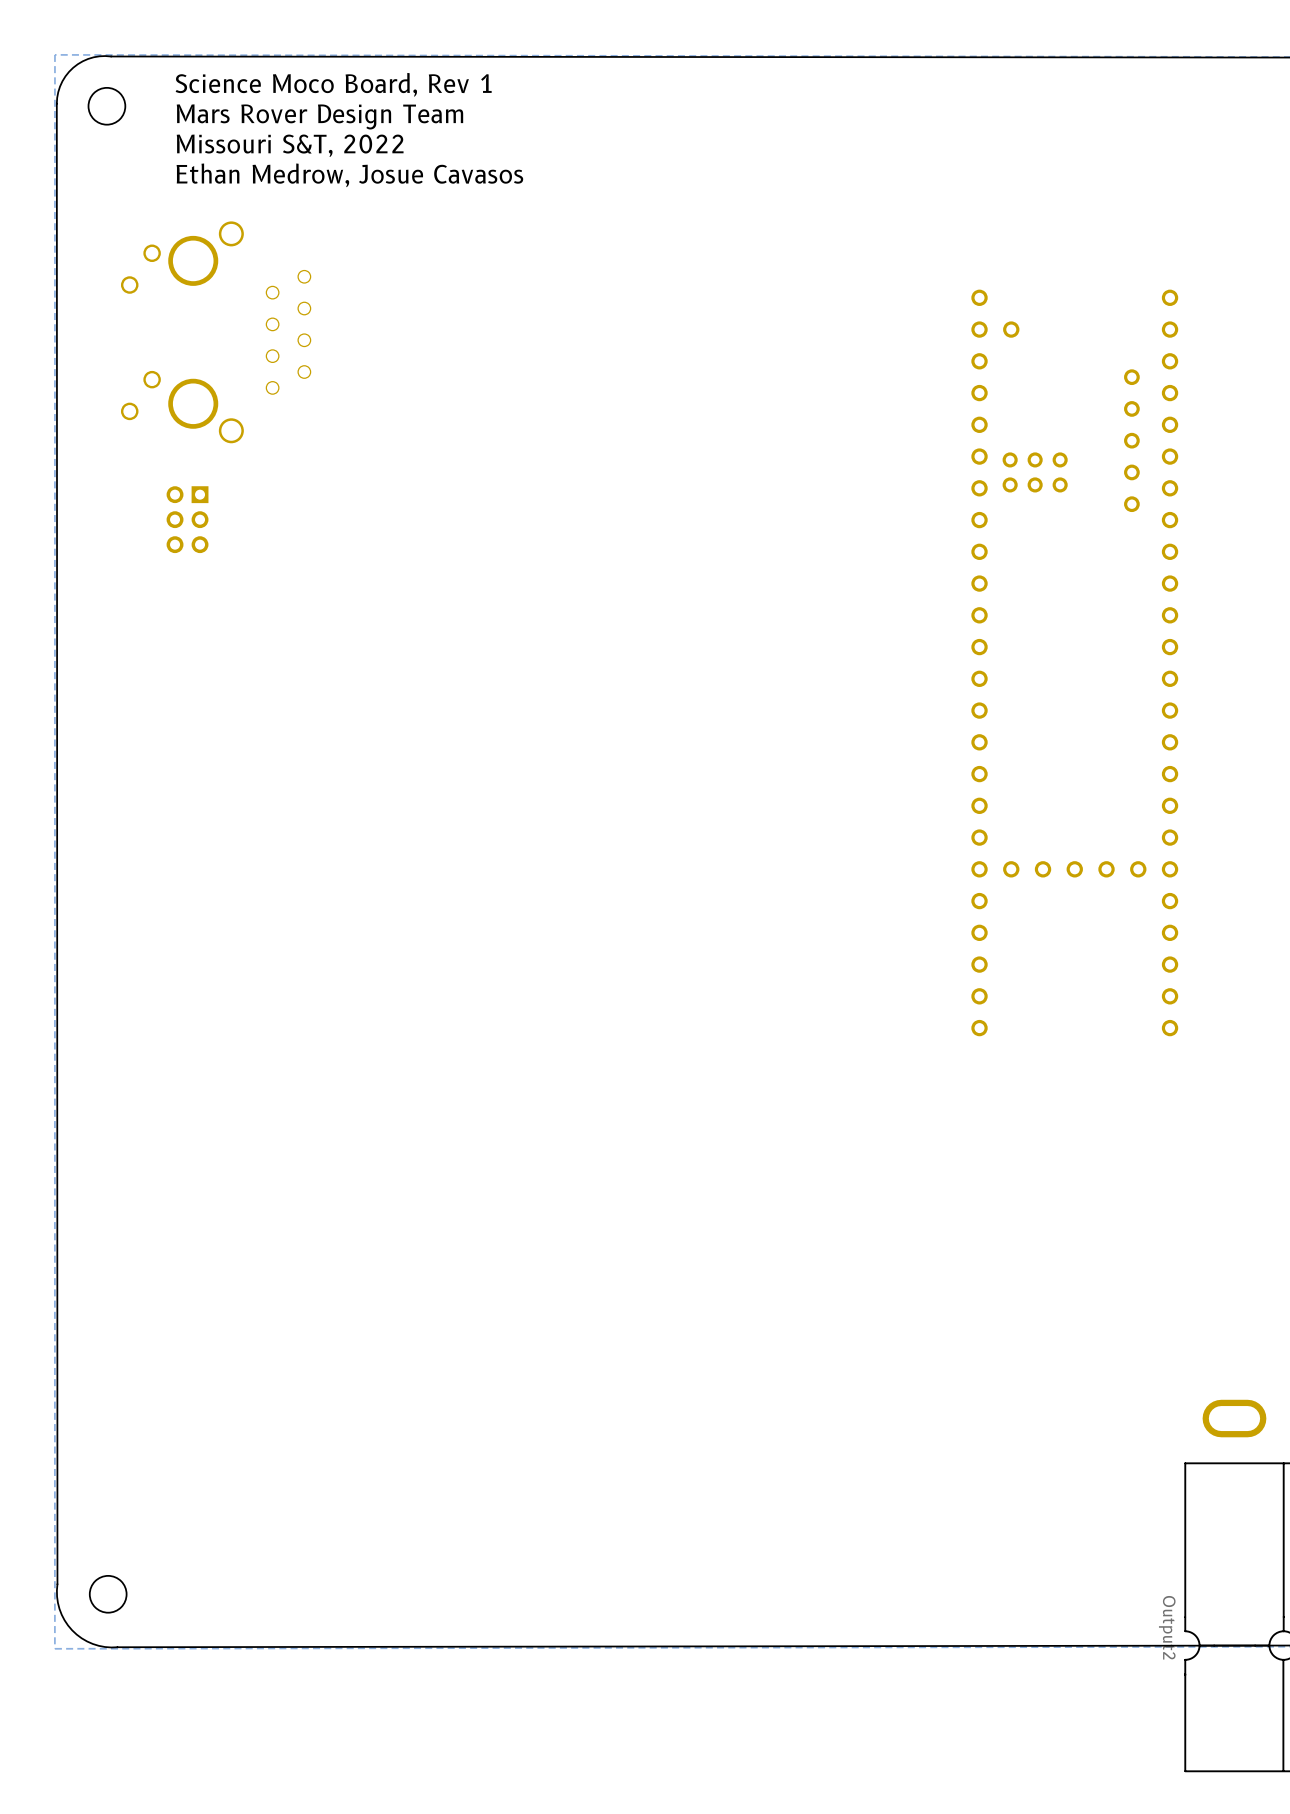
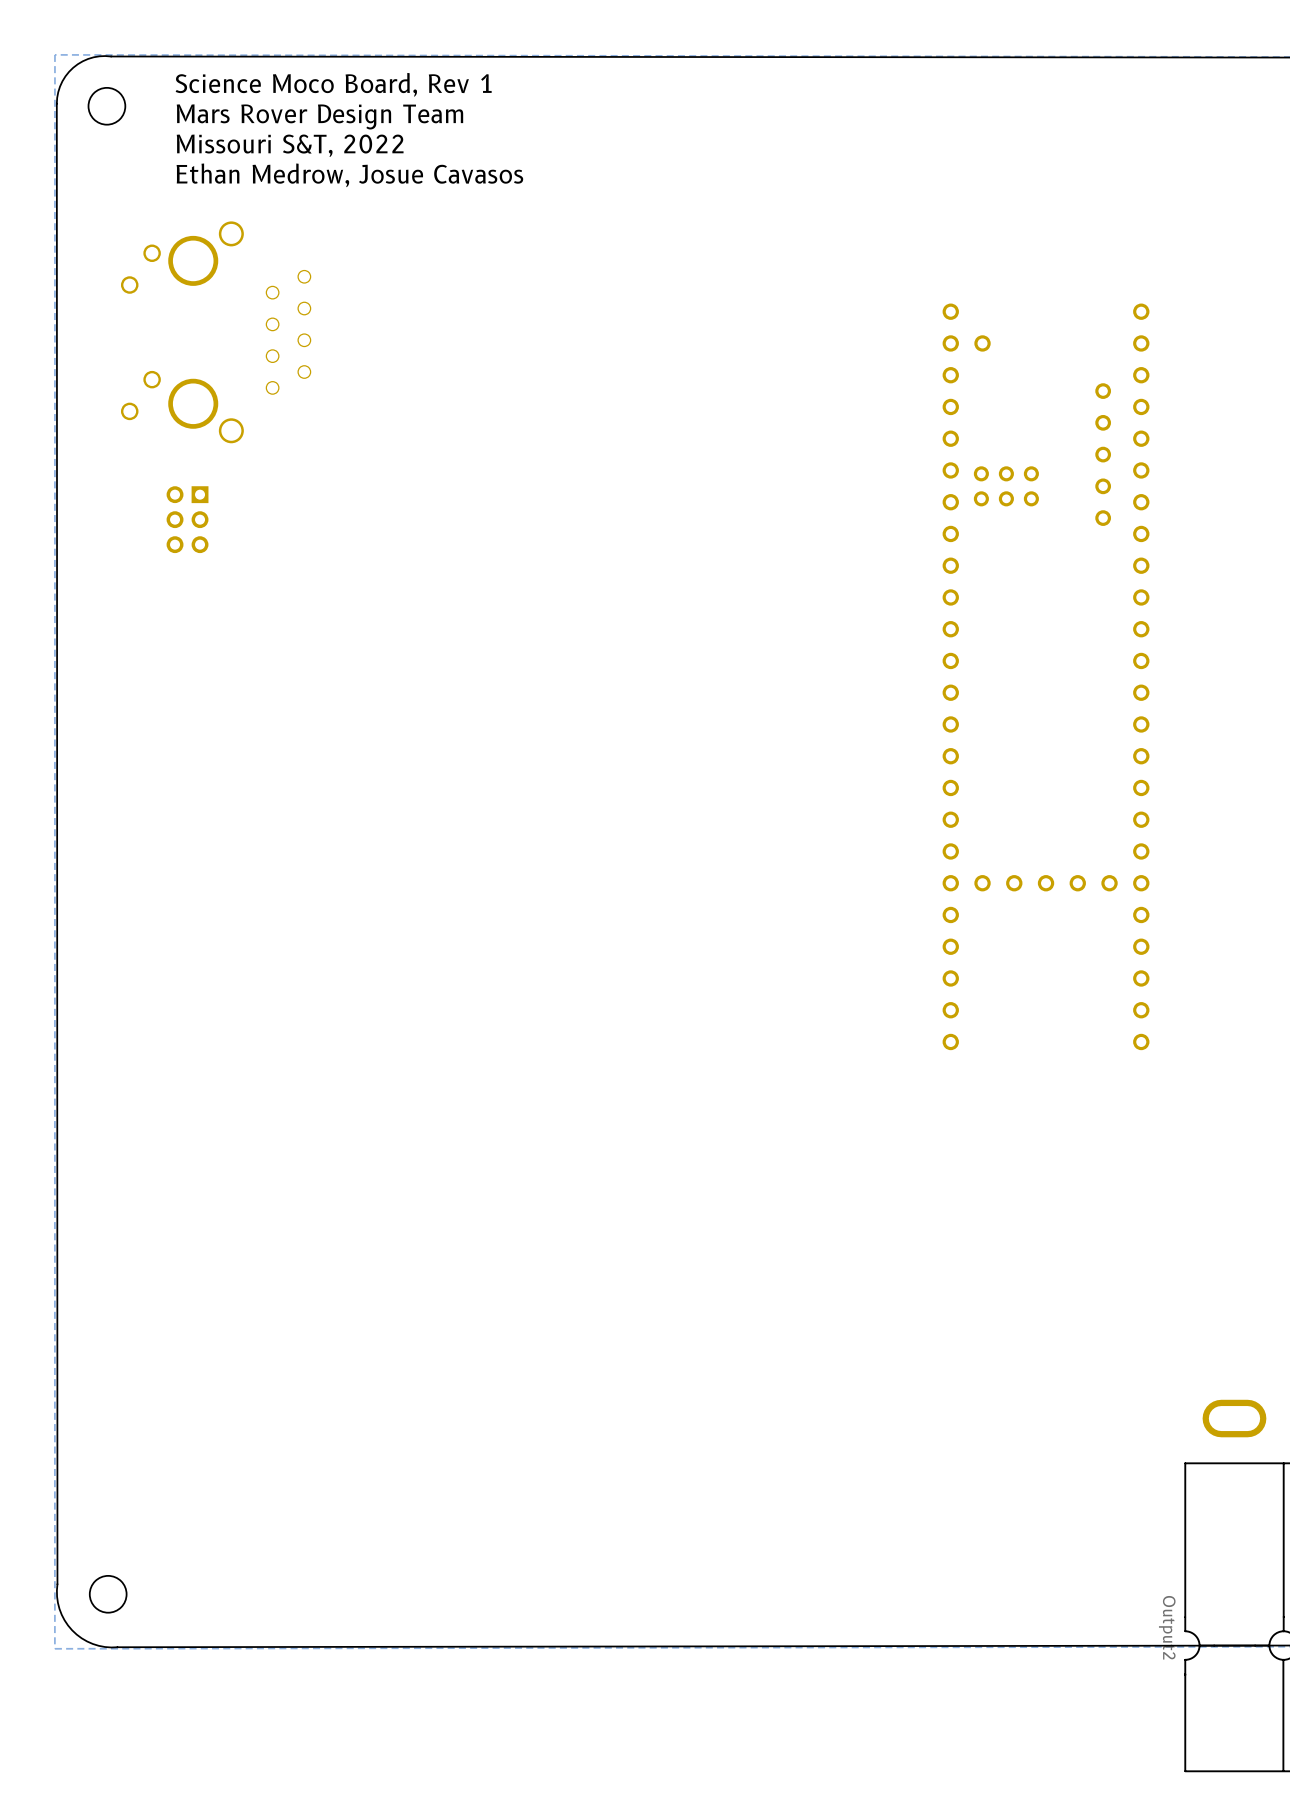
part position: (1074, 662) -> (1046, 676)

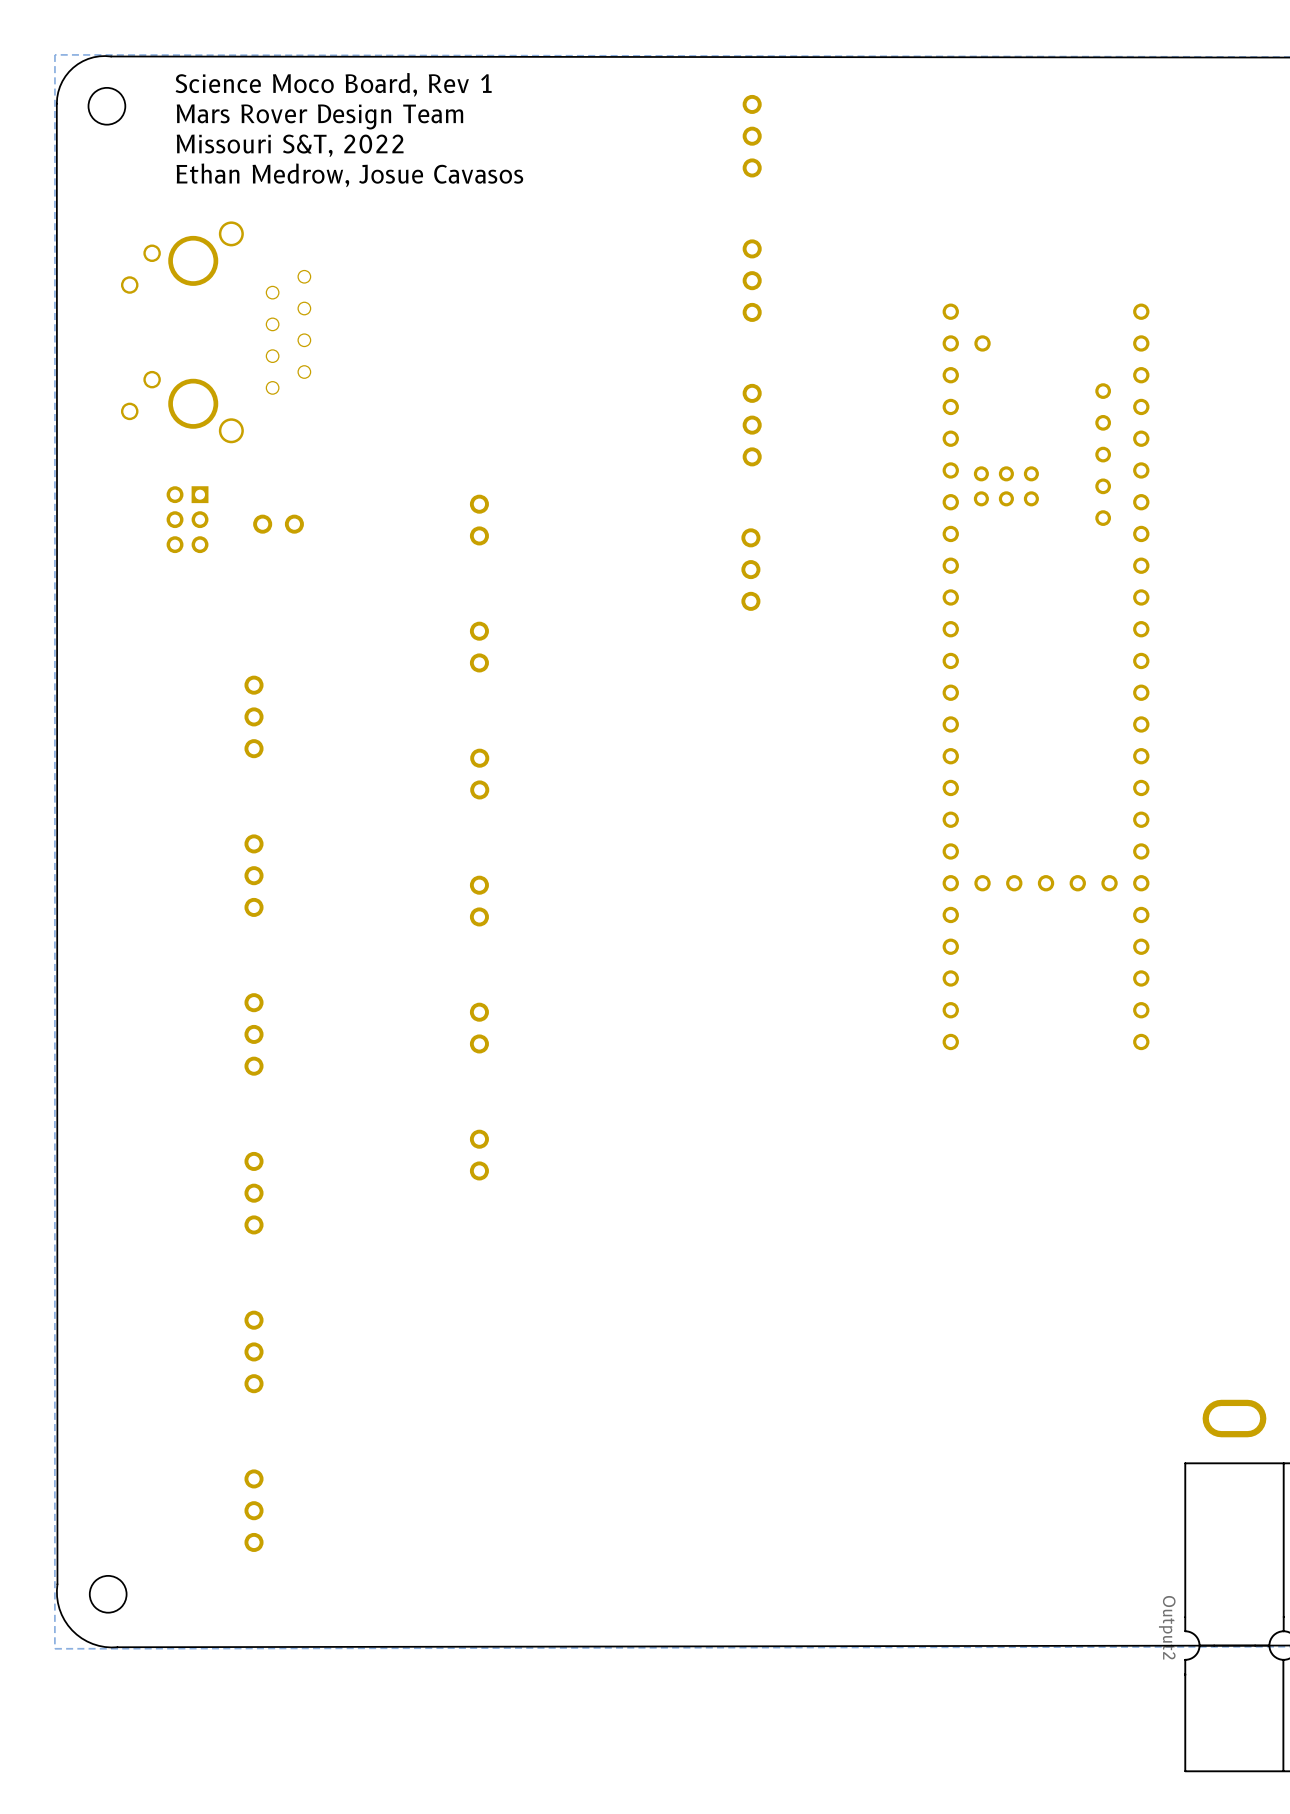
part: none -> (752, 136)
part: none -> (752, 280)
part: none -> (752, 425)
part: none -> (479, 520)
part: none -> (278, 524)
part: none -> (750, 569)
part: none -> (479, 647)
part: none -> (254, 716)
part: none -> (479, 774)
part: none -> (254, 875)
part: none -> (479, 901)
part: none -> (479, 1028)
part: none -> (254, 1034)
part: none -> (479, 1155)
part: none -> (254, 1193)
part: none -> (254, 1351)
part: none -> (254, 1510)

